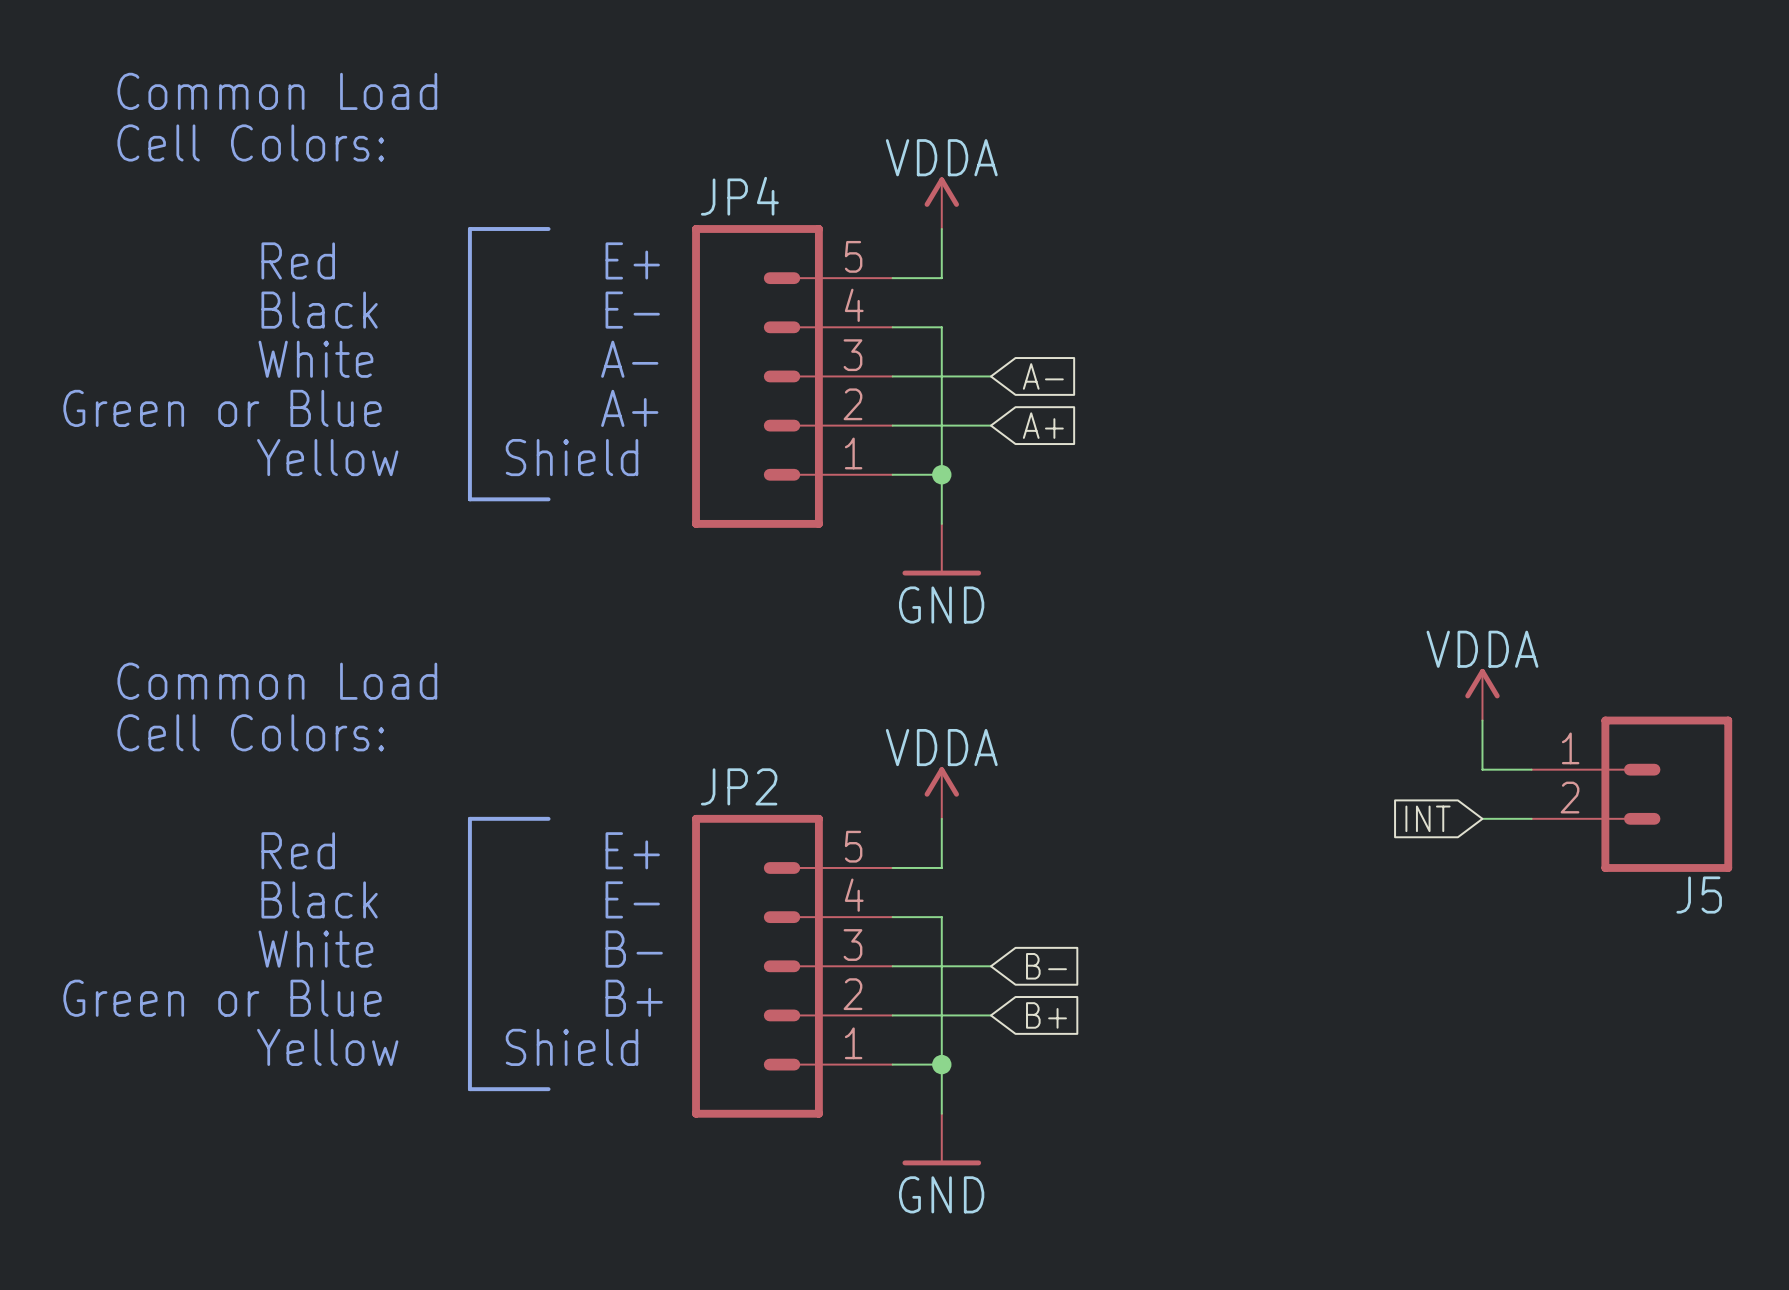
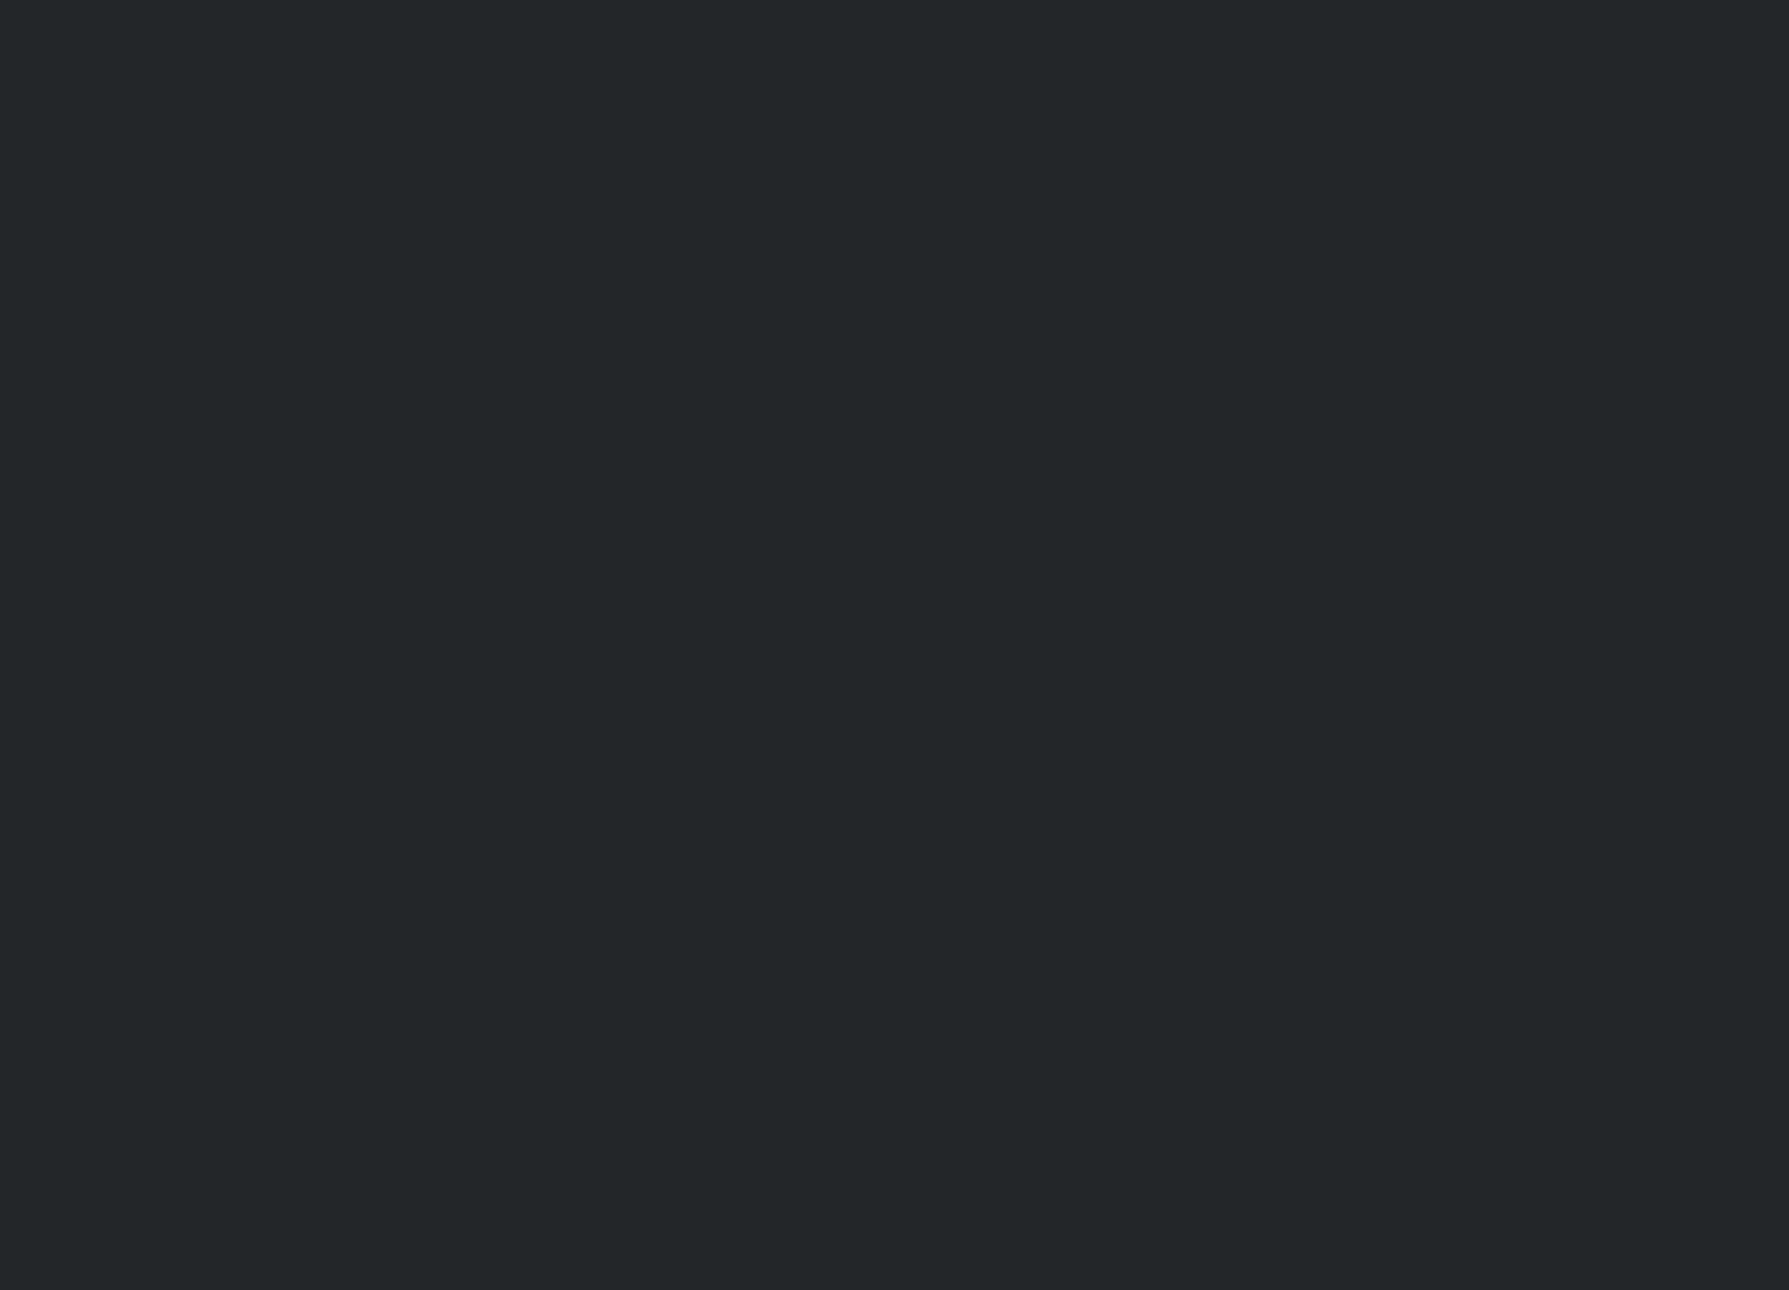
text: Common Load (277, 91) -> none
text: Cell Colors: (250, 142) -> none
power symbol: VDDA (941, 203) -> none
line: (548, 228) (469, 228) (469, 499) (548, 499) -> none
wire: (941, 228) (941, 278) (892, 278) -> none
text: Red (298, 260) -> none
text: E+ (632, 260) -> none
text: Black (319, 310) -> none
text: E- (632, 310) -> none
wire: (892, 327) (941, 327) (941, 523) -> none
text: White (315, 359) -> none
text: A- (629, 359) -> none
JP4: (792, 376) -> none
wire: (892, 376) (990, 376) -> none
global label: A- (1043, 376) -> none
text: Green or Blue (222, 408) -> none
text: A+ (629, 408) -> none
wire: (892, 425) (990, 425) -> none
global label: A+ (1043, 425) -> none
text: Yellow (327, 457) -> none
text: Shield (572, 457) -> none
wire: (892, 474) (941, 474) -> none
junction: (941, 474) -> none
power symbol: GND (941, 549) -> none
text: Common Load (277, 681) -> none
power symbol: VDDA (1482, 694) -> none
wire: (1482, 720) (1482, 769) (1531, 769) -> none
text: Cell Colors: (250, 732) -> none
power symbol: VDDA (941, 793) -> none
J5: (1631, 794) -> none
line: (548, 818) (469, 818) (469, 1089) (548, 1089) -> none
wire: (941, 818) (941, 867) (892, 867) -> none
global label: INT (1427, 818) -> none
wire: (1482, 818) (1531, 818) -> none
text: Red (298, 850) -> none
text: E+ (632, 850) -> none
text: Black (319, 899) -> none
text: E- (632, 899) -> none
wire: (892, 917) (941, 917) (941, 1113) -> none
text: White (315, 949) -> none
text: B- (634, 949) -> none
JP2: (792, 966) -> none
wire: (892, 966) (990, 966) -> none
global label: B- (1046, 966) -> none
text: Green or Blue (222, 998) -> none
text: B+ (634, 998) -> none
wire: (892, 1015) (990, 1015) -> none
global label: B+ (1046, 1015) -> none
text: Yellow (327, 1047) -> none
text: Shield (572, 1047) -> none
wire: (892, 1064) (941, 1064) -> none
junction: (941, 1064) -> none
power symbol: GND (941, 1139) -> none

